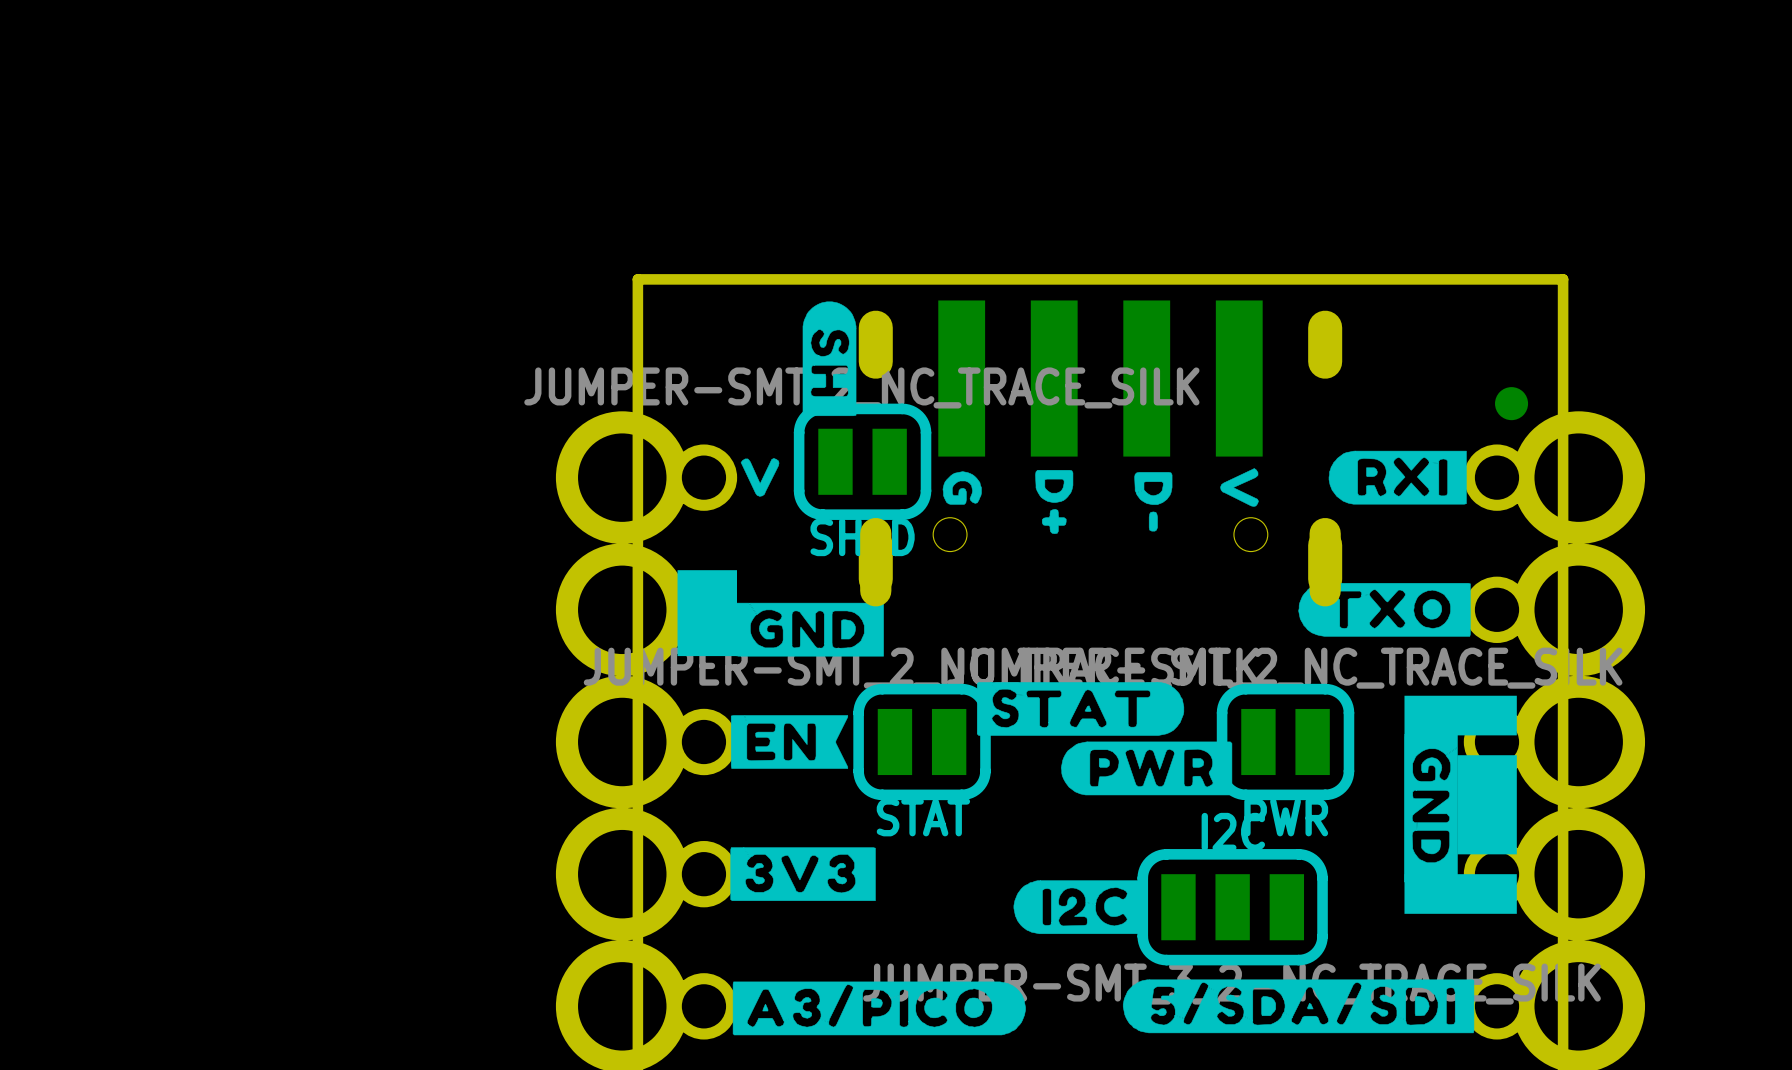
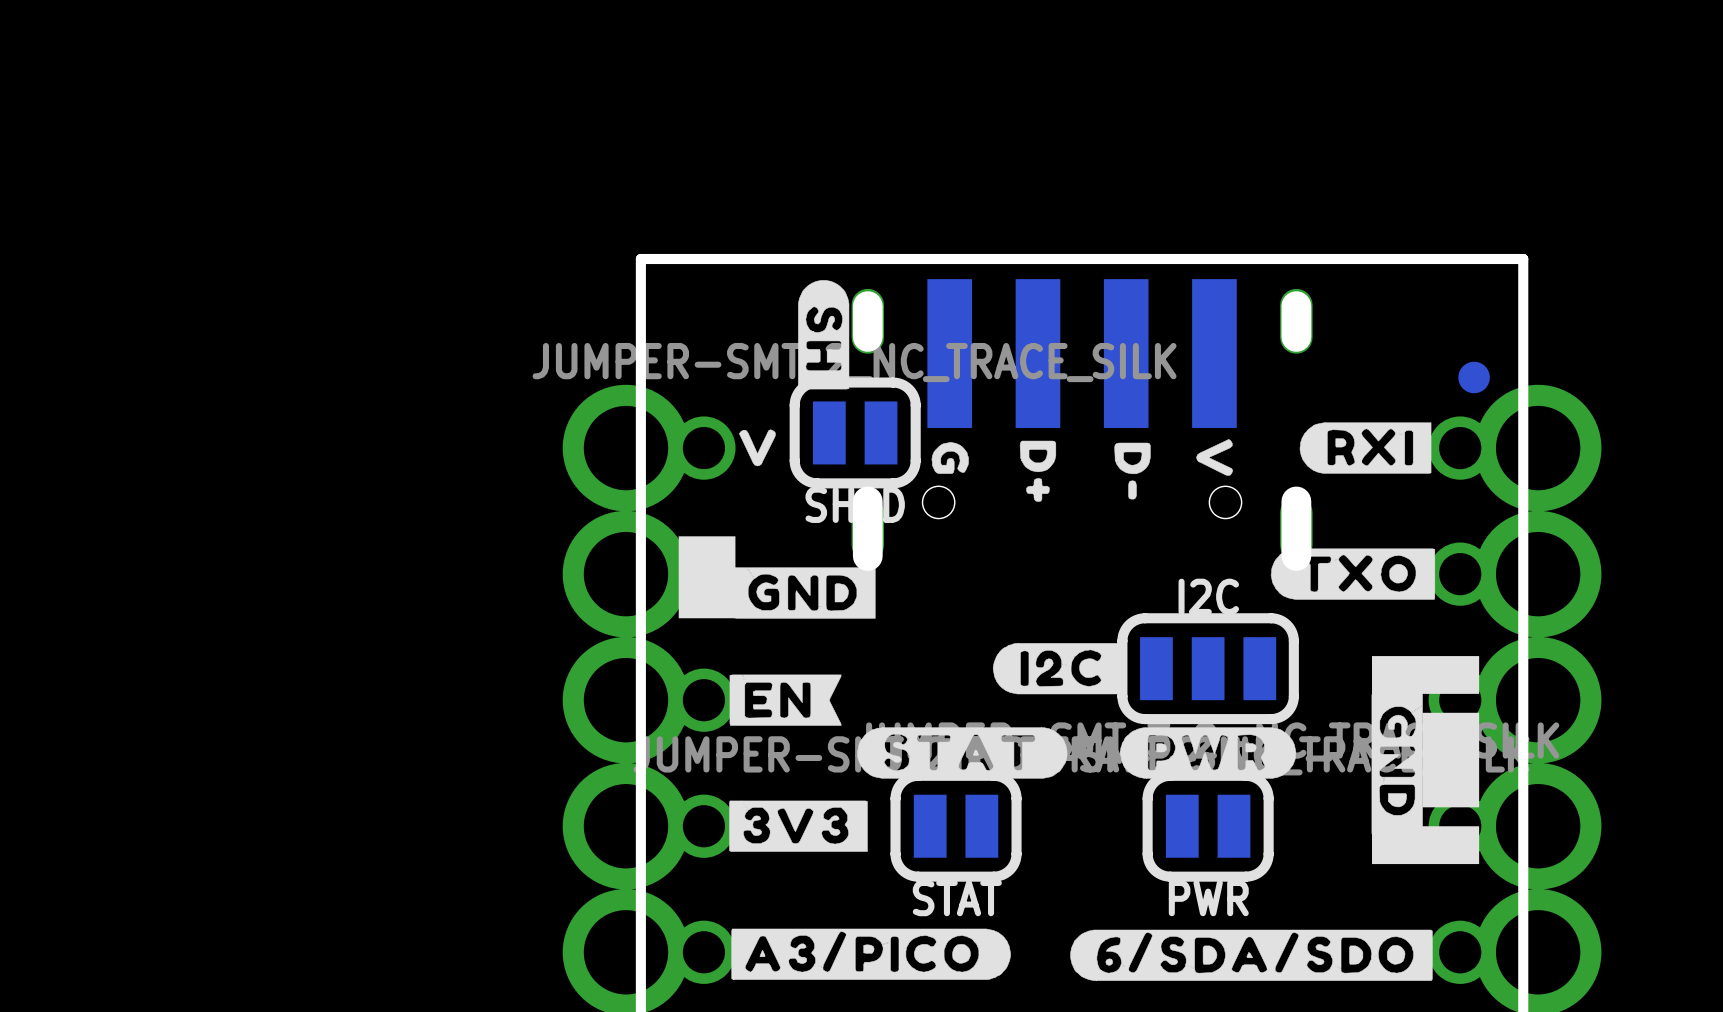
drawing: [976, 682, 1233, 796] -> none
STAT position: (922, 742) -> (956, 826)
PWR position: (1285, 742) -> (1208, 826)
drawing: none -> [857, 727, 1297, 779]
drawing position: (1080, 907) -> (1056, 668)
I2C position: (1232, 907) -> (1208, 668)
drawing shape: [1122, 979, 1475, 1034] -> [1070, 929, 1433, 981]

